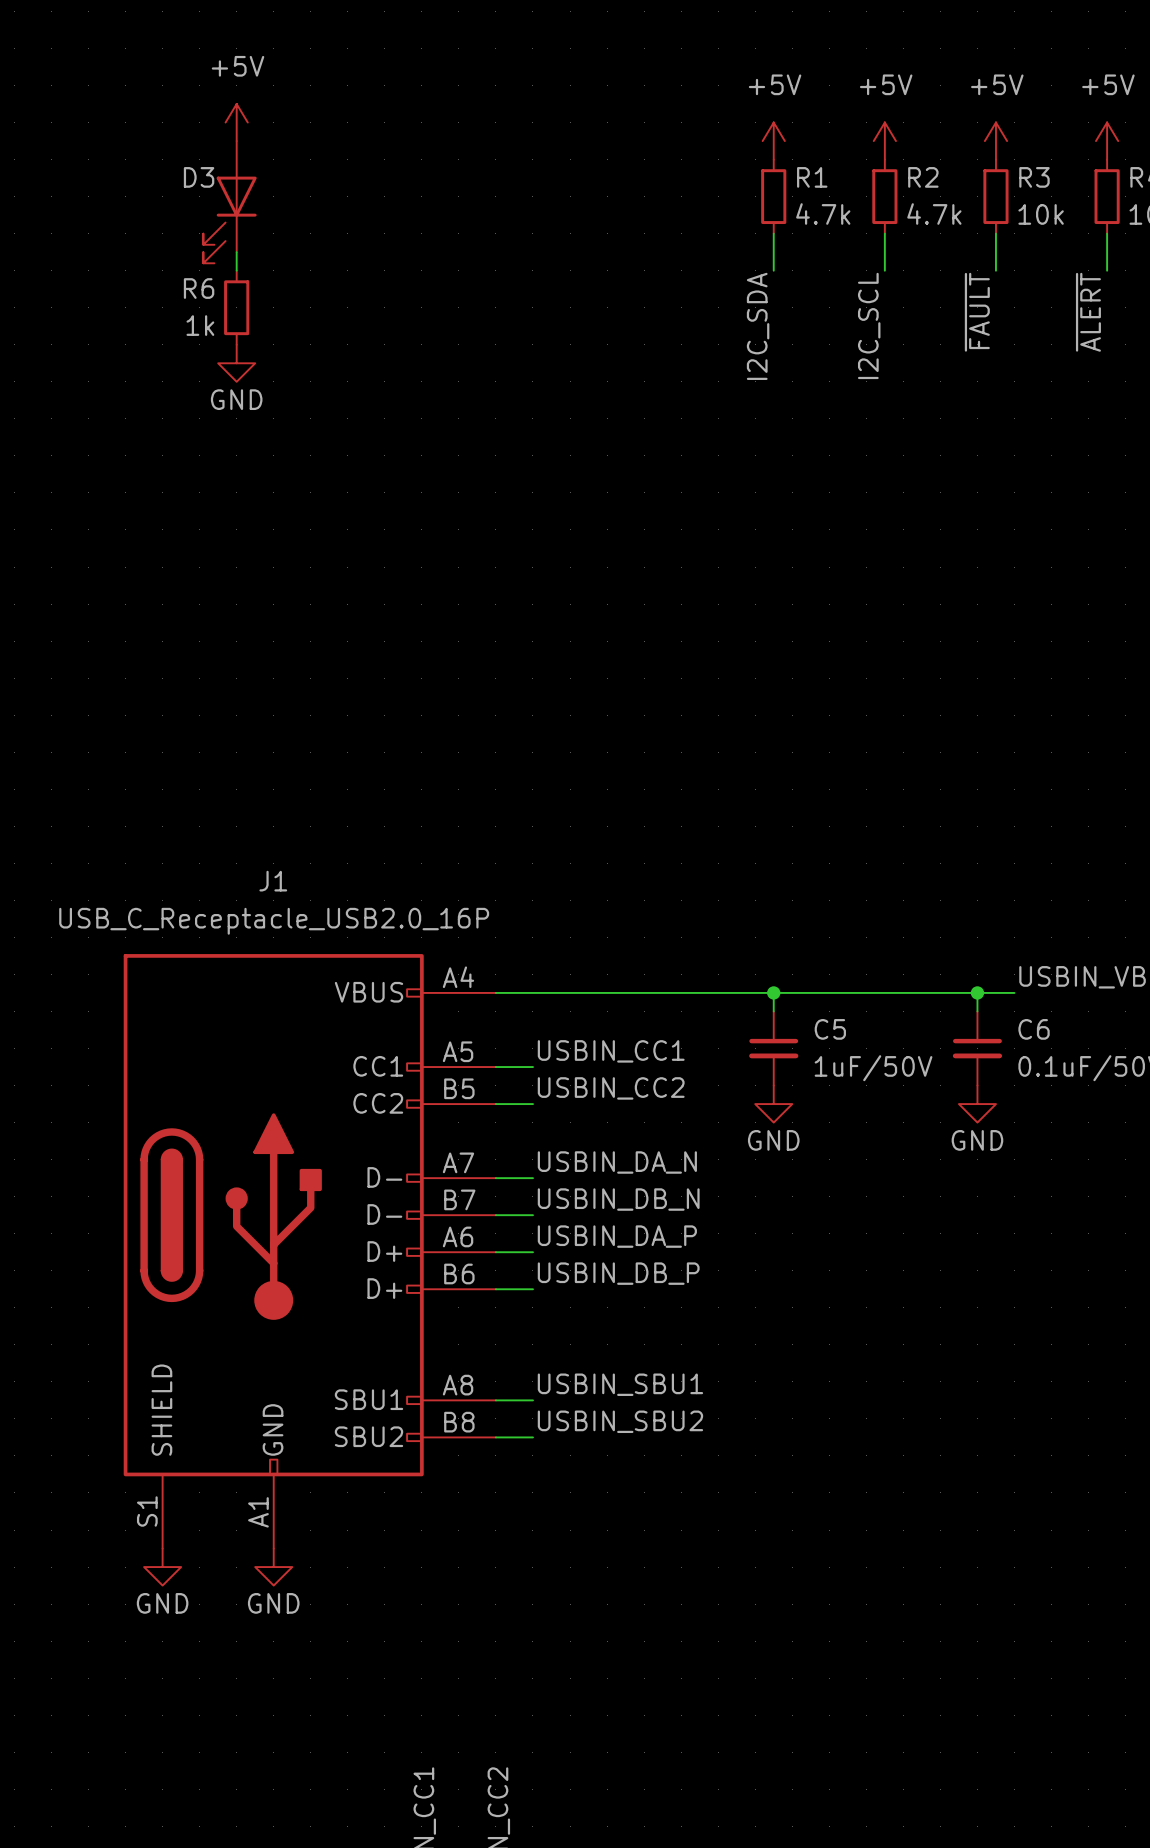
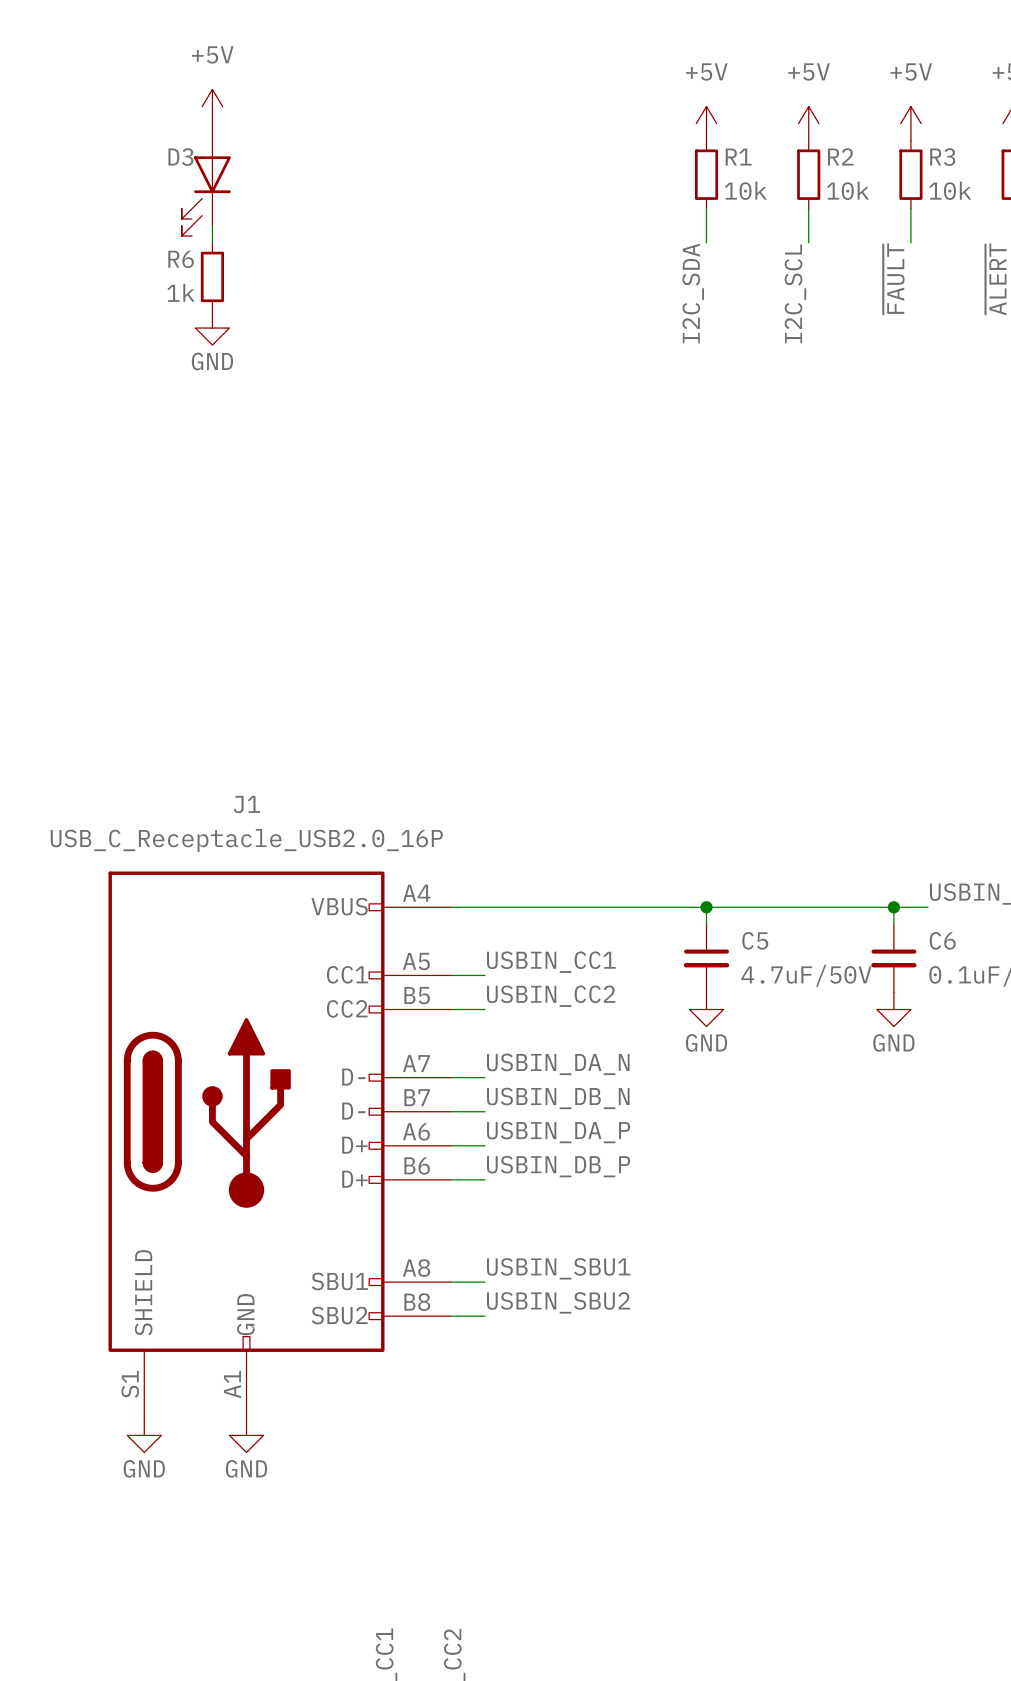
R1 value: 4.7k (823, 214) -> 10k (745, 190)
R2 value: 4.7k (934, 214) -> 10k (848, 190)
C5 value: 1uF/50V (873, 1068) -> 4.7uF/50V (806, 975)

